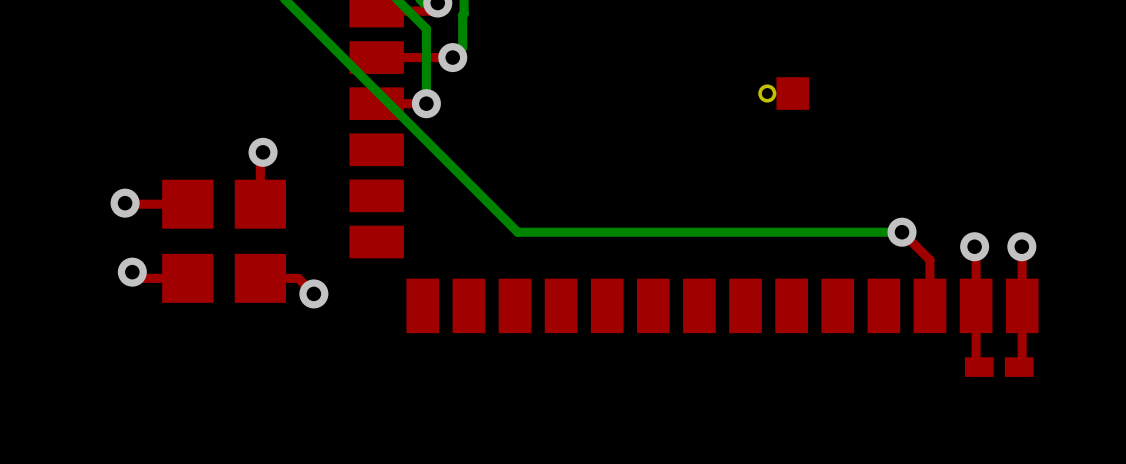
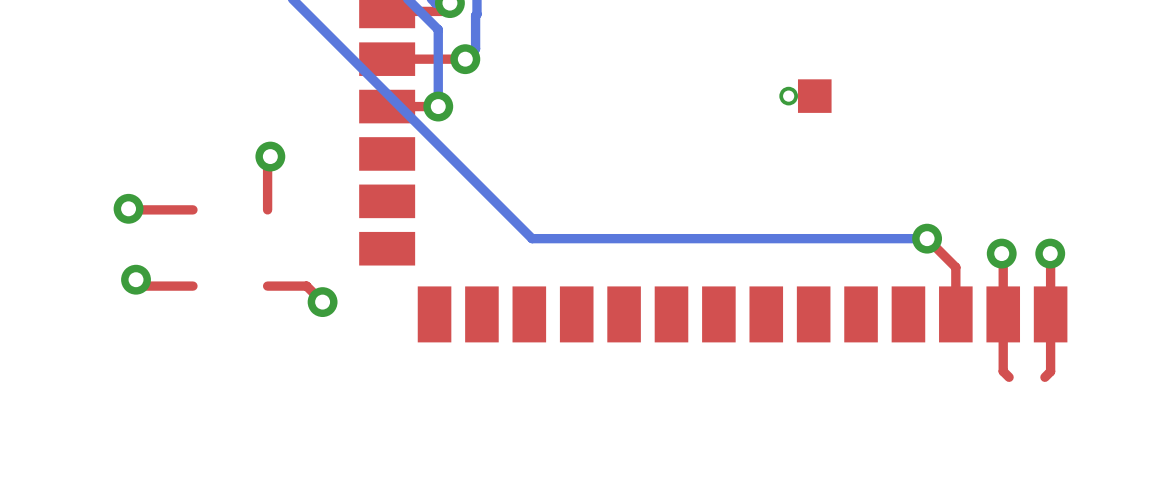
part: (224, 204) -> none
part: (224, 278) -> none
part: (999, 367) -> none

